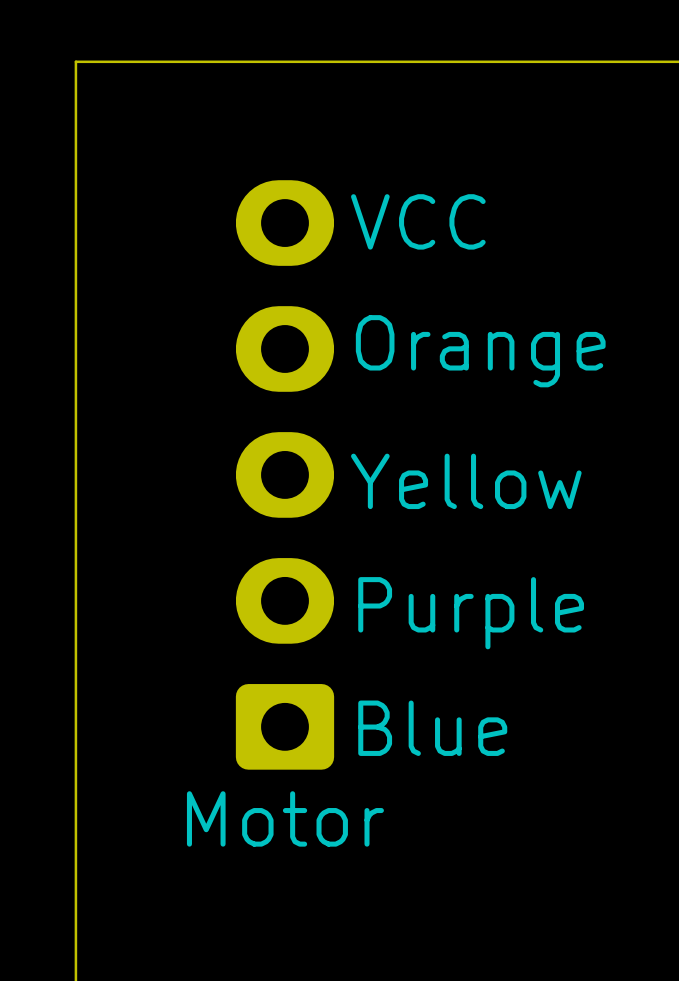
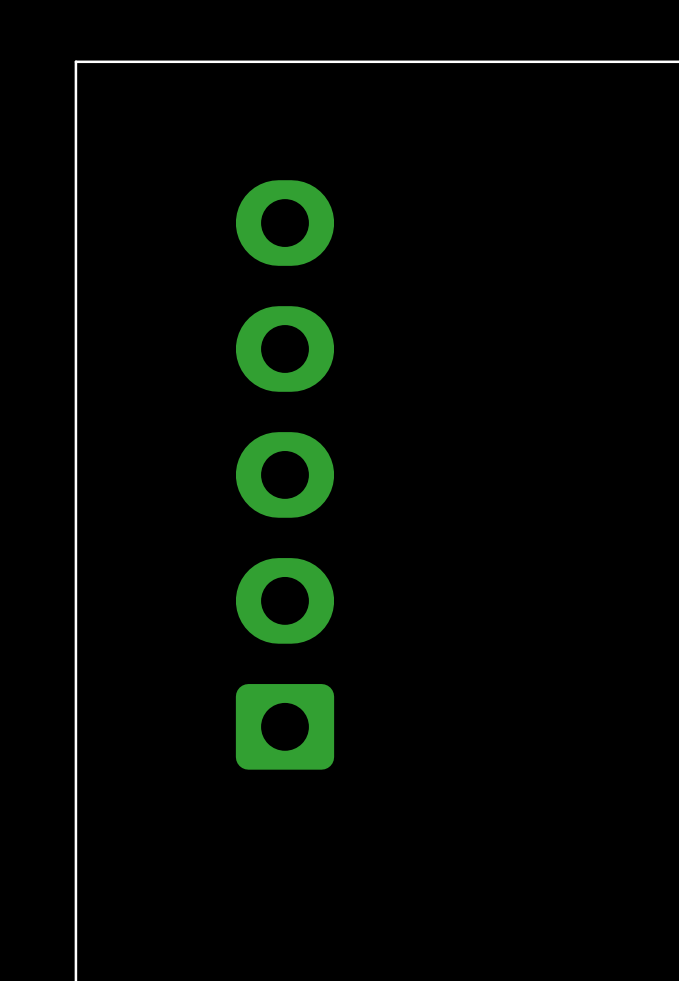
text: VCC (418, 221) -> none
text: Orange (480, 351) -> none
text: Yellow (466, 481) -> none
text: Purple (471, 613) -> none
text: Blue (432, 728) -> none
text: Motor (285, 818) -> none

